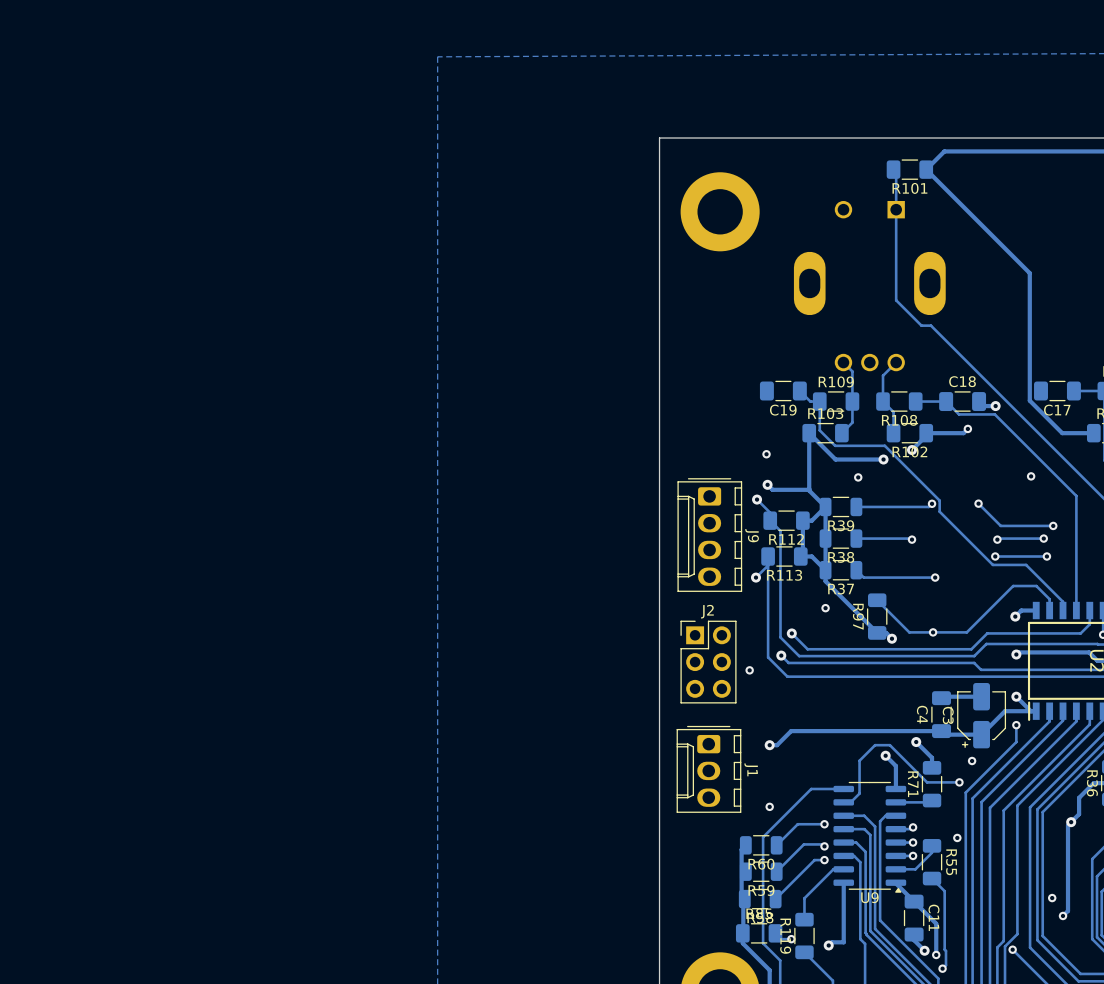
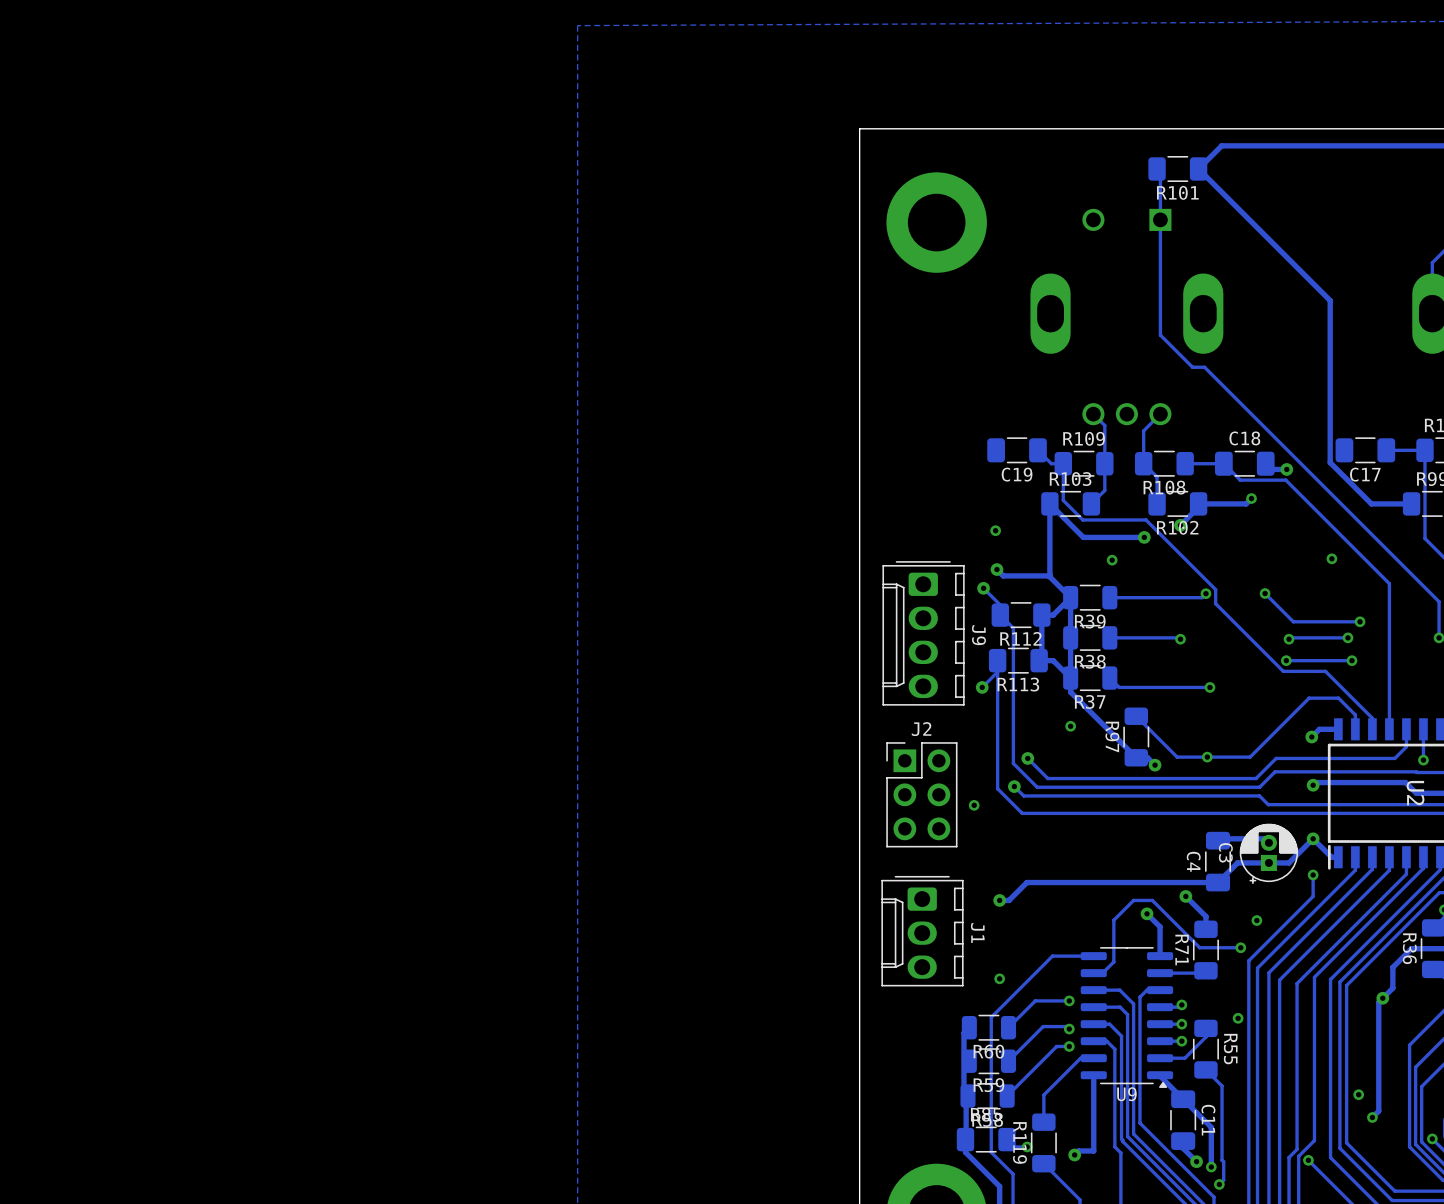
C3 footprint: [957, 683, 1007, 749] -> [1239, 823, 1299, 885]
track: none -> (1313, 838) (1289, 862) (1237, 862) (1218, 882)
track: (1030, 711) (1005, 711) (981, 734) (945, 734) -> none

